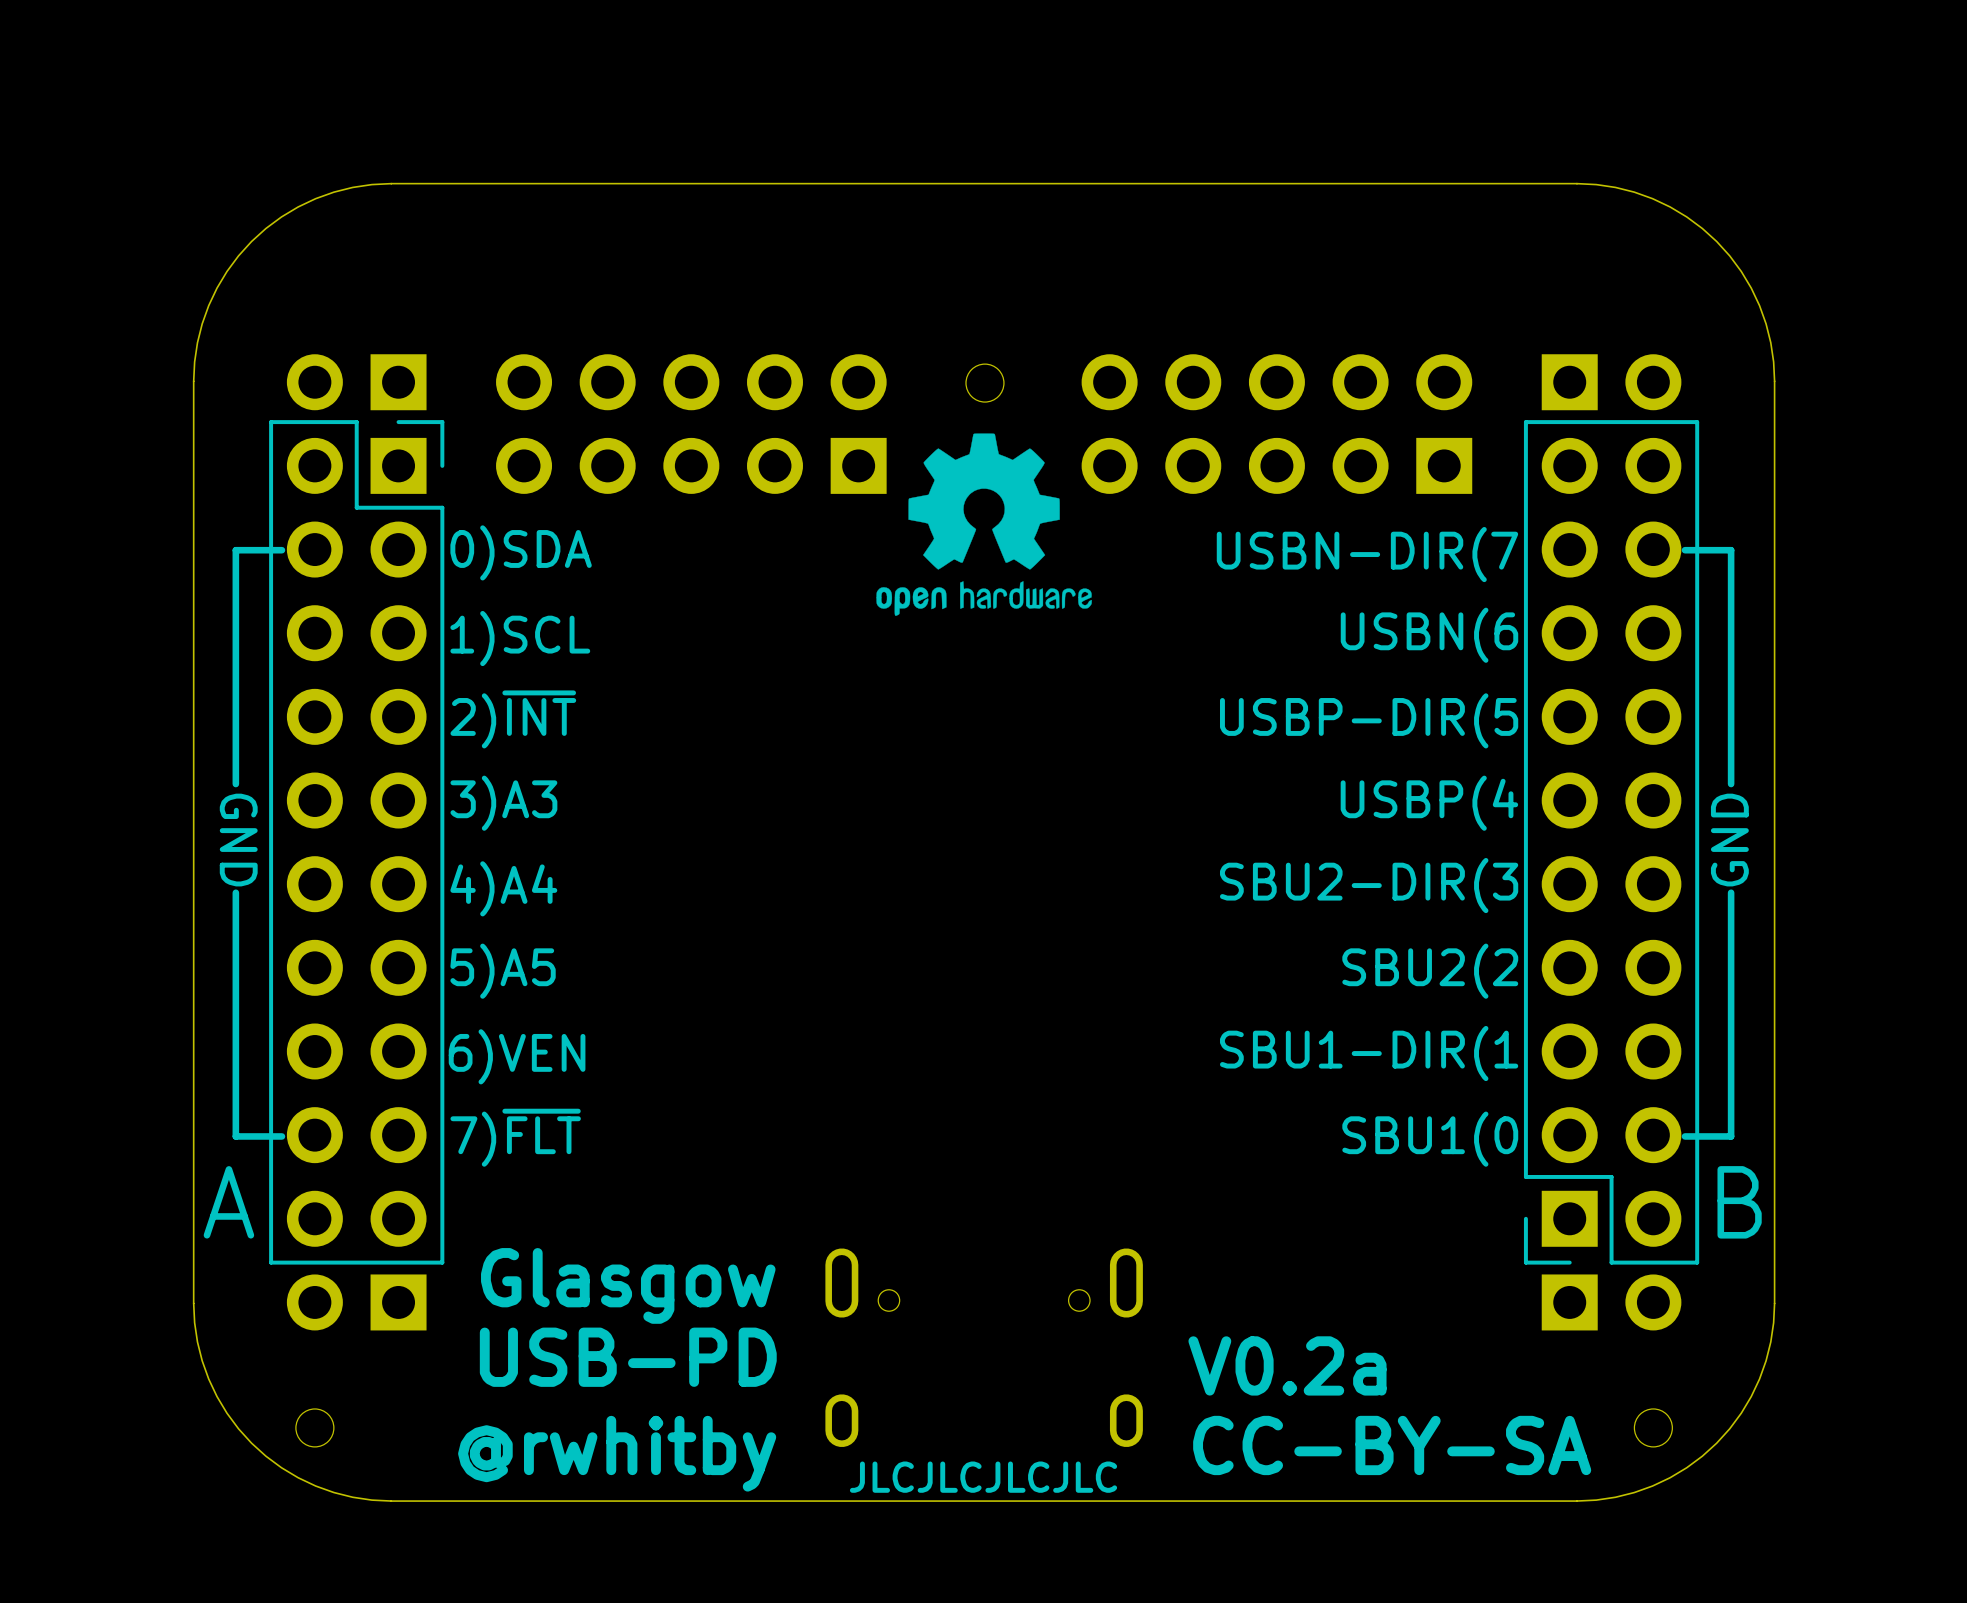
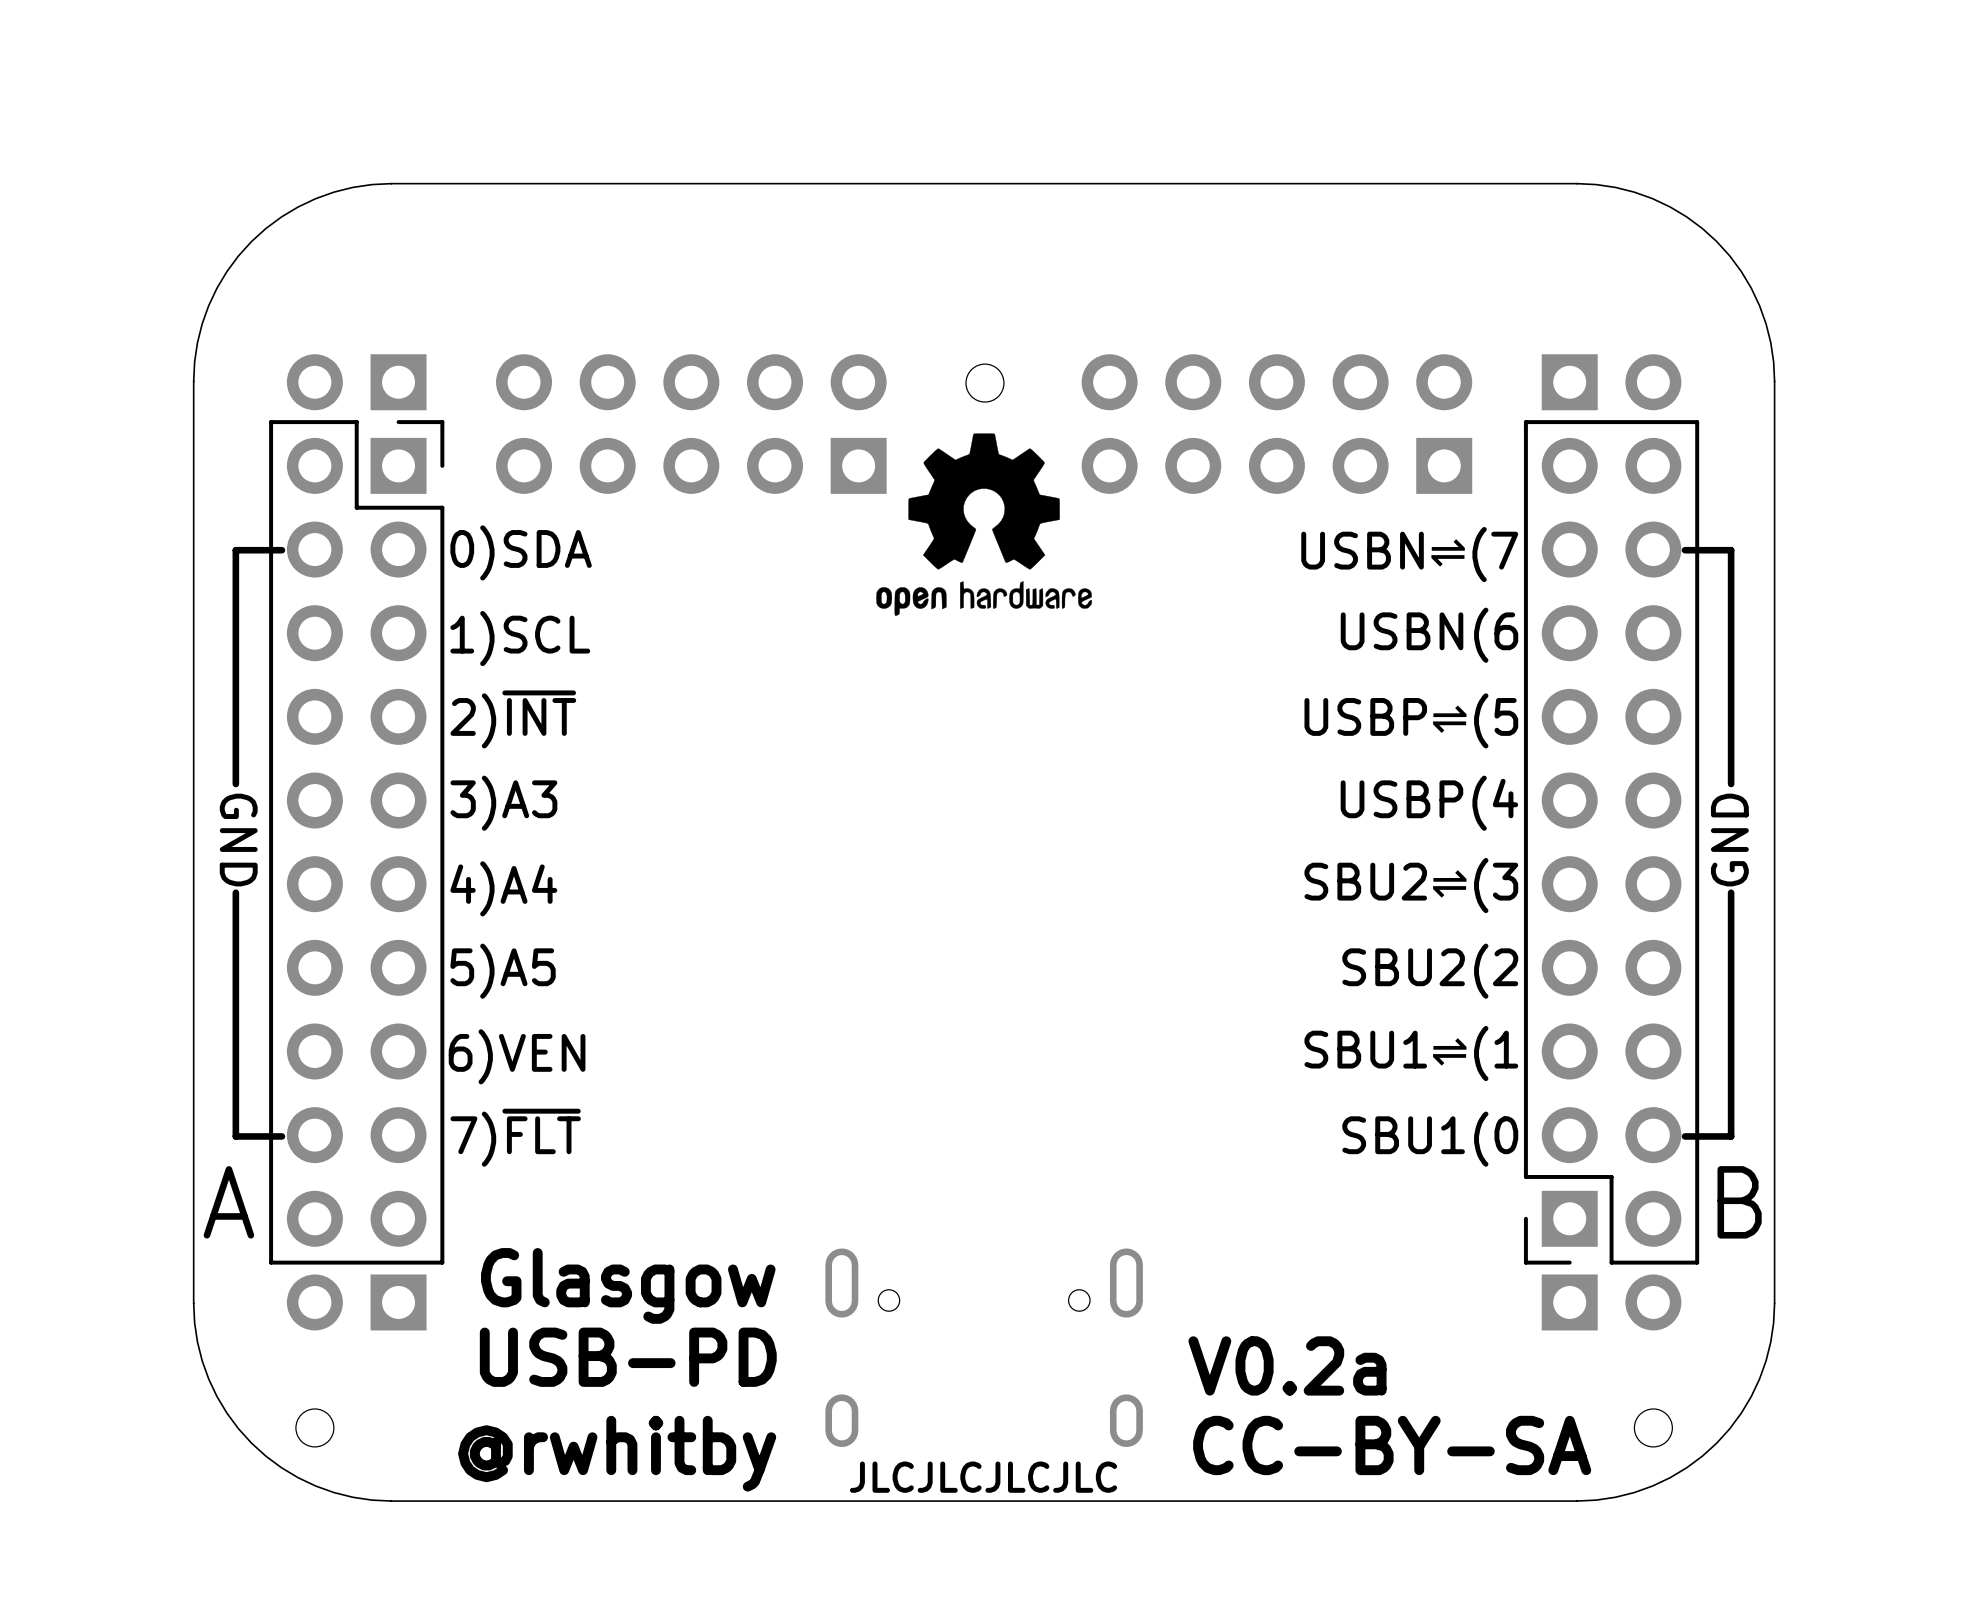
text: USBN-DIR(7 (1367, 554) -> USBN⇌(7 (1409, 554)
text: USBP-DIR(5 (1369, 720) -> USBP⇌(5 (1411, 720)
text: SBU2-DIR(3 (1369, 885) -> SBU2⇌(3 (1411, 885)
text: SBU1-DIR(1 (1369, 1053) -> SBU1⇌(1 (1411, 1053)

